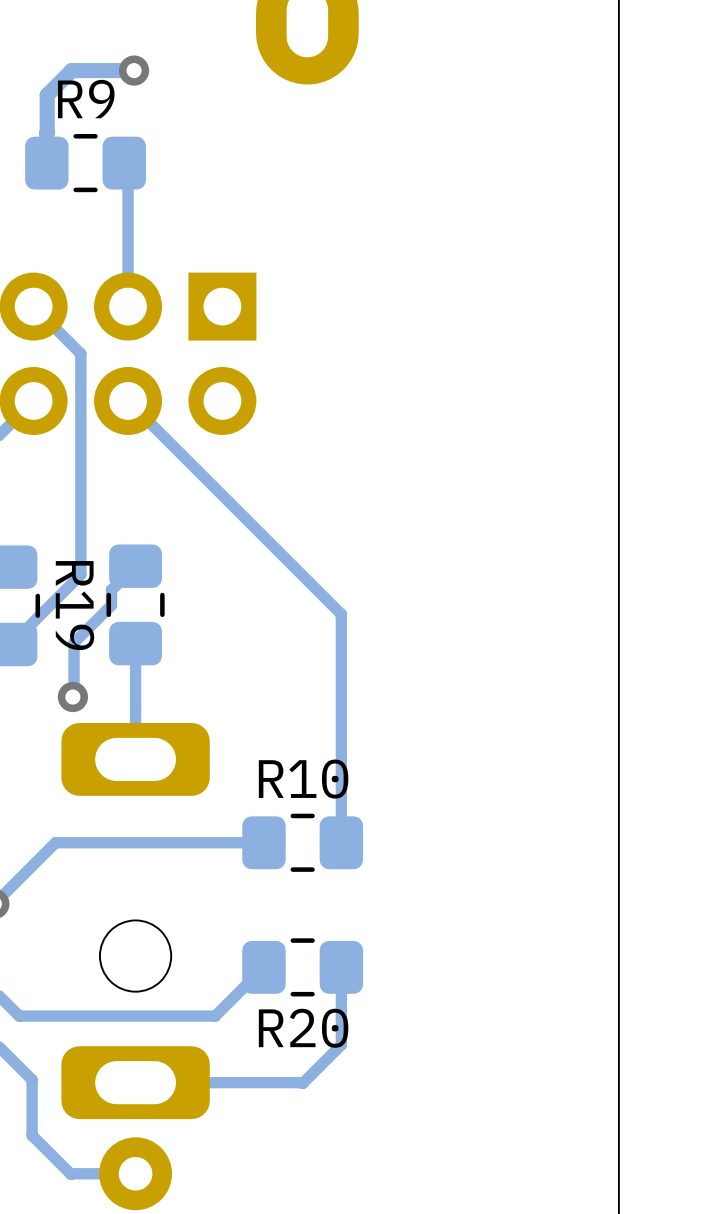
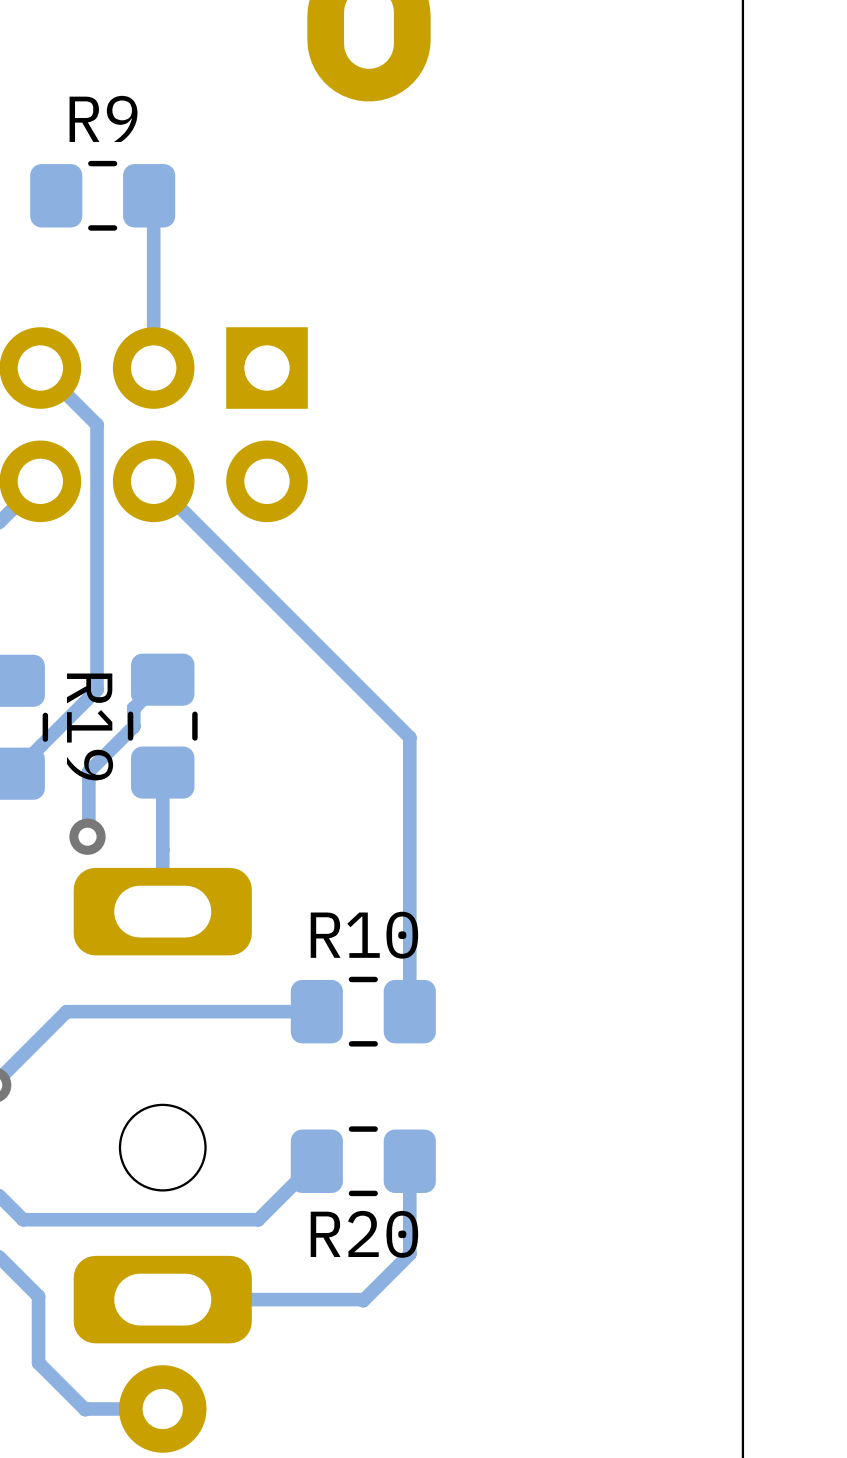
track: (134, 70) (71, 70) (47, 95) (47, 132) -> none
via: (134, 70) -> none

